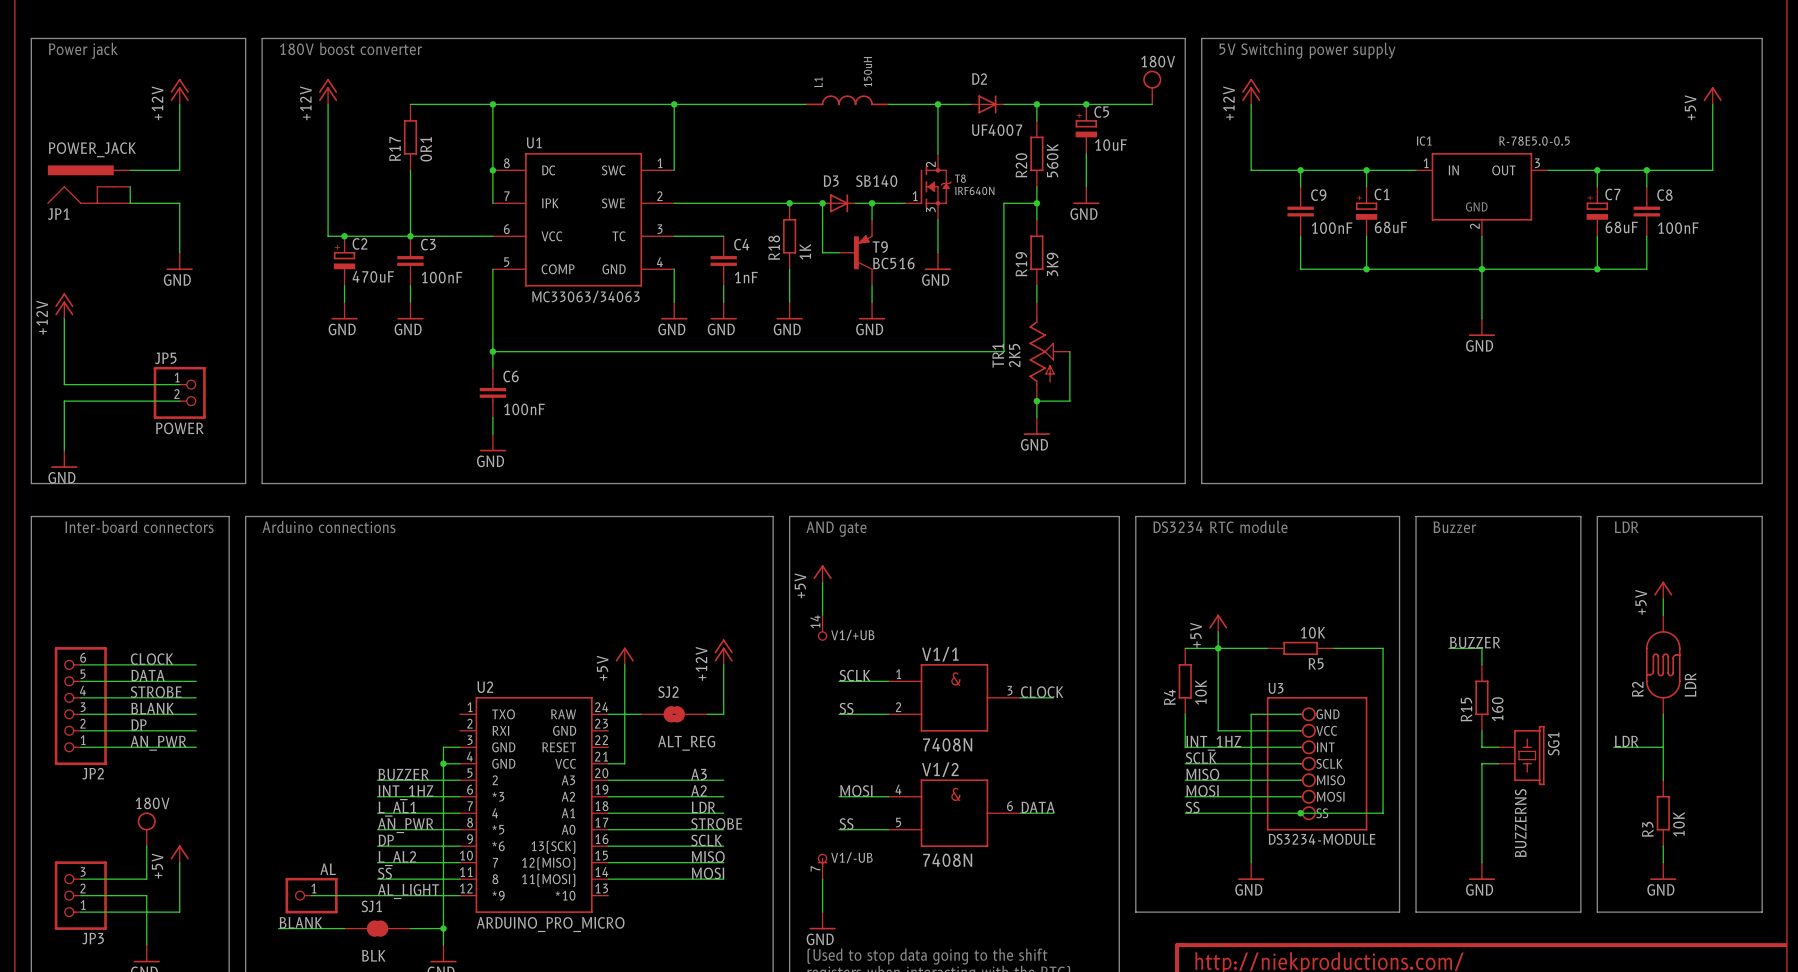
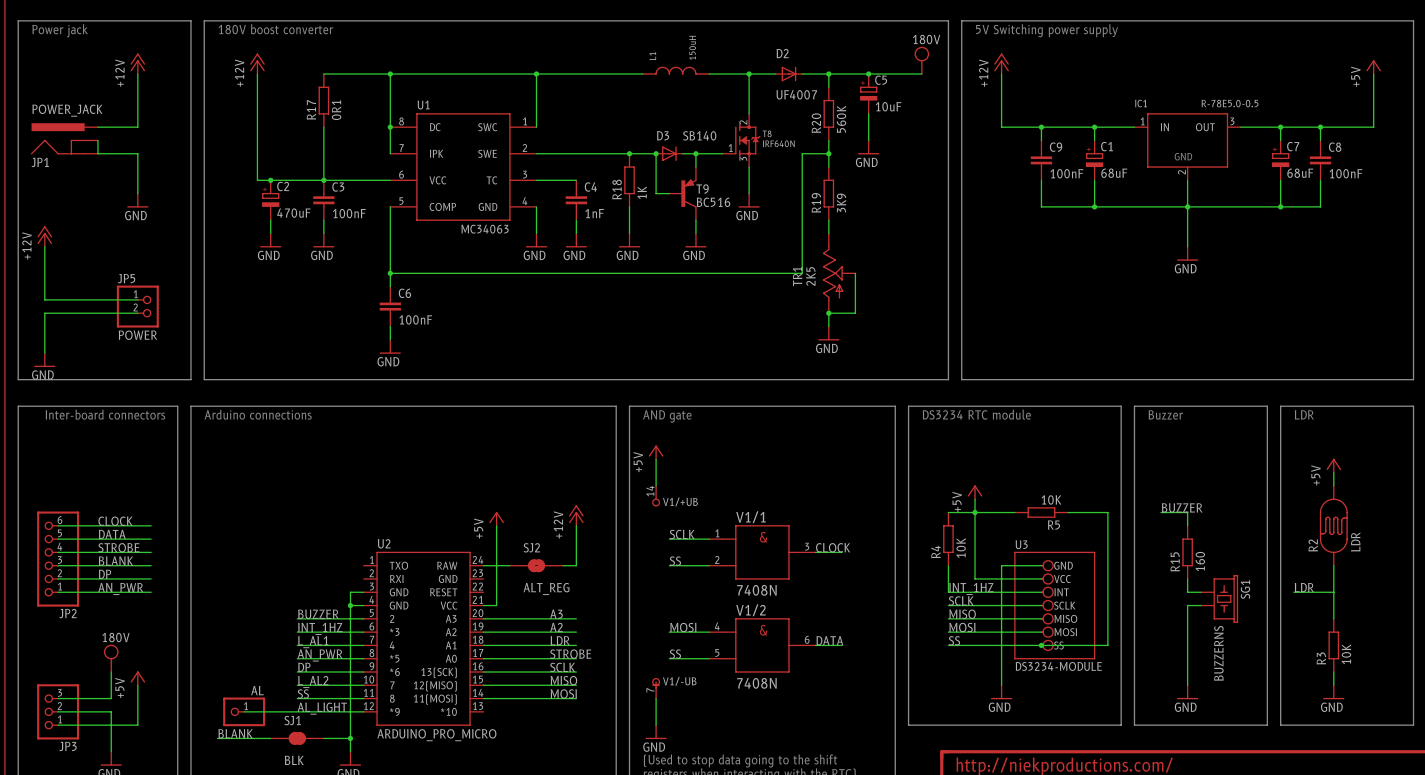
U1 text: MC33063/34063 (585, 296) -> none
U1 value: none -> MC34063 (485, 229)

